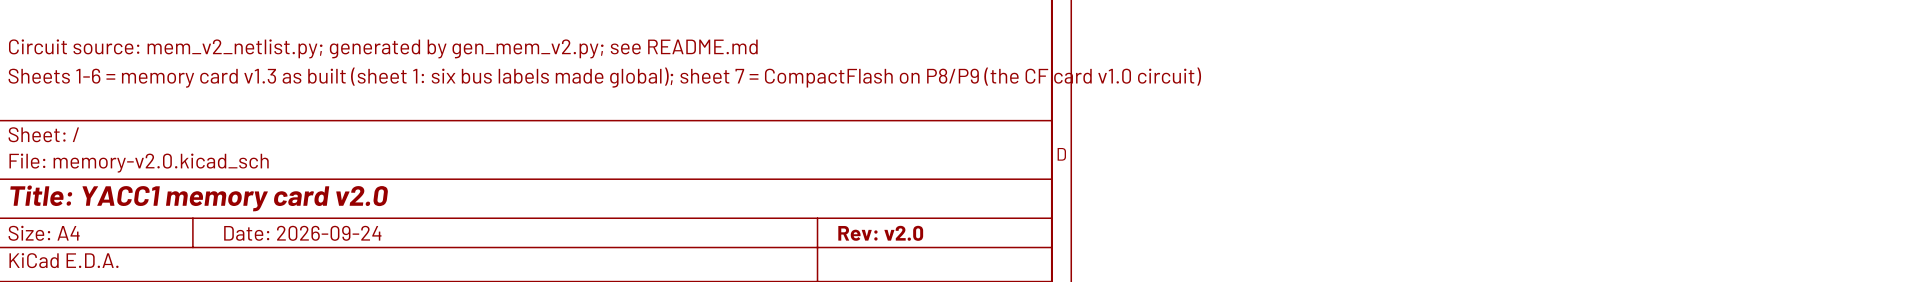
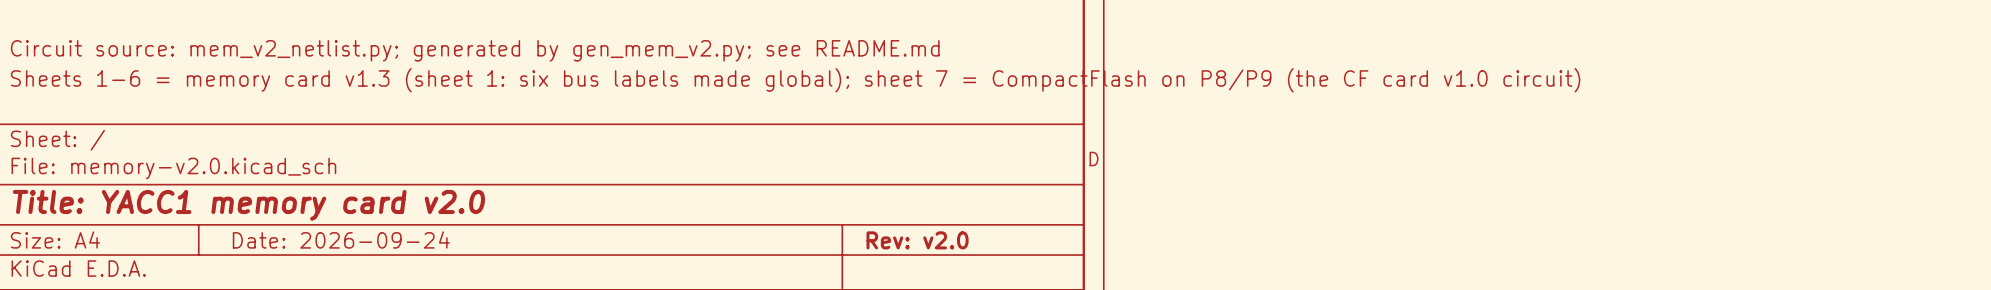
title block: Sheets 1-6 = memory card v1.3 as built (sheet 1: six bus labels made global); sheet 7 = CompactFlash on P8/P9 (the CF card v1.0 circuit) (604, 77) -> Sheets 1-6 = memory card v1.3 (sheet 1: six bus labels made global); sheet 7 = CompactFlash on P8/P9 (the CF card v1.0 circuit) (795, 80)

